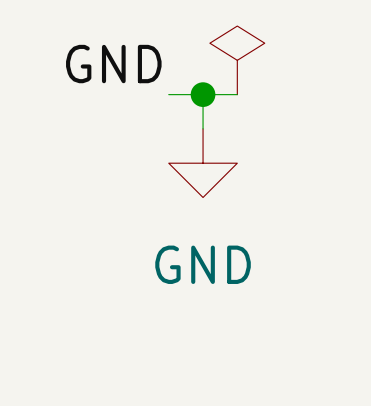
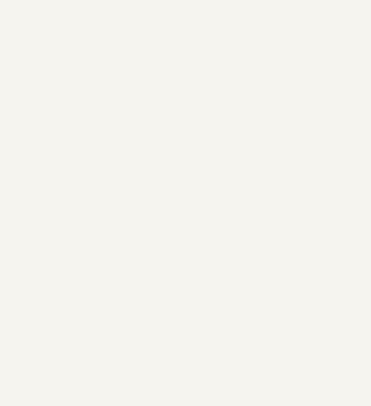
power symbol: (237, 60) -> none
label: GND (113, 64) -> none
wire: (168, 94) (237, 94) -> none
wire: (203, 94) (203, 128) -> none
junction: (203, 94) -> none
power symbol: GND (203, 163) -> none

